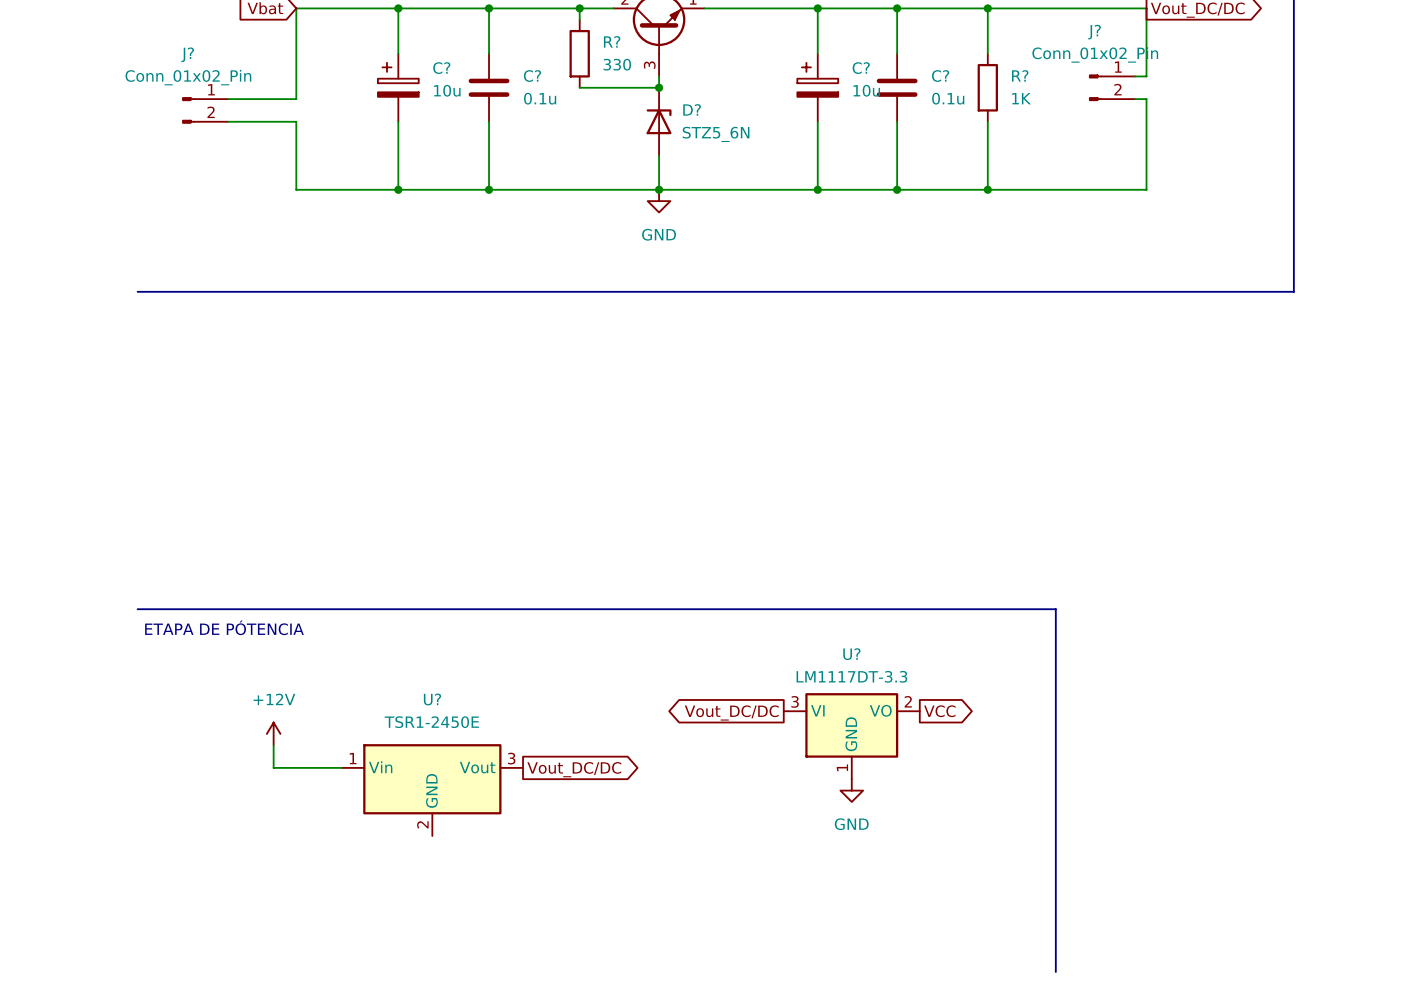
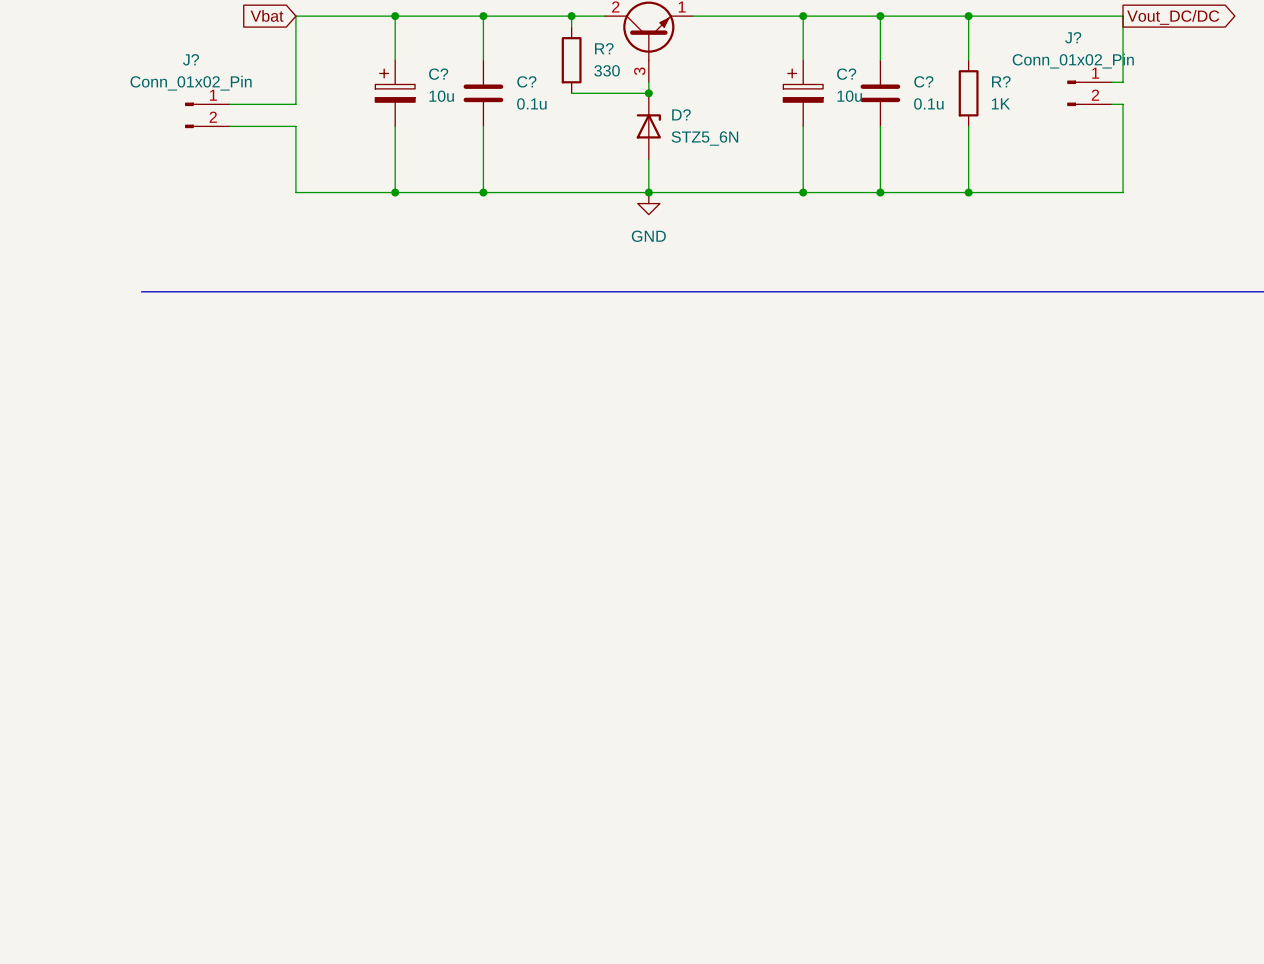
line: (137, 609) (1055, 609) (1055, 971) -> none
text: ETAPA DE PÓTENCIA (224, 627) -> none
global label: VCC (939, 711) -> none
global label: Vout_DC/DC (731, 712) -> none
power symbol: +12V (273, 733) -> none
U?: LM1117DT-3.3 (851, 736) -> none
wire: (273, 745) (273, 767) (341, 767) -> none
global label: Vout_DC/DC (574, 769) -> none
U?: TSR1-2450E (432, 790) -> none
power symbol: GND (851, 790) -> none

